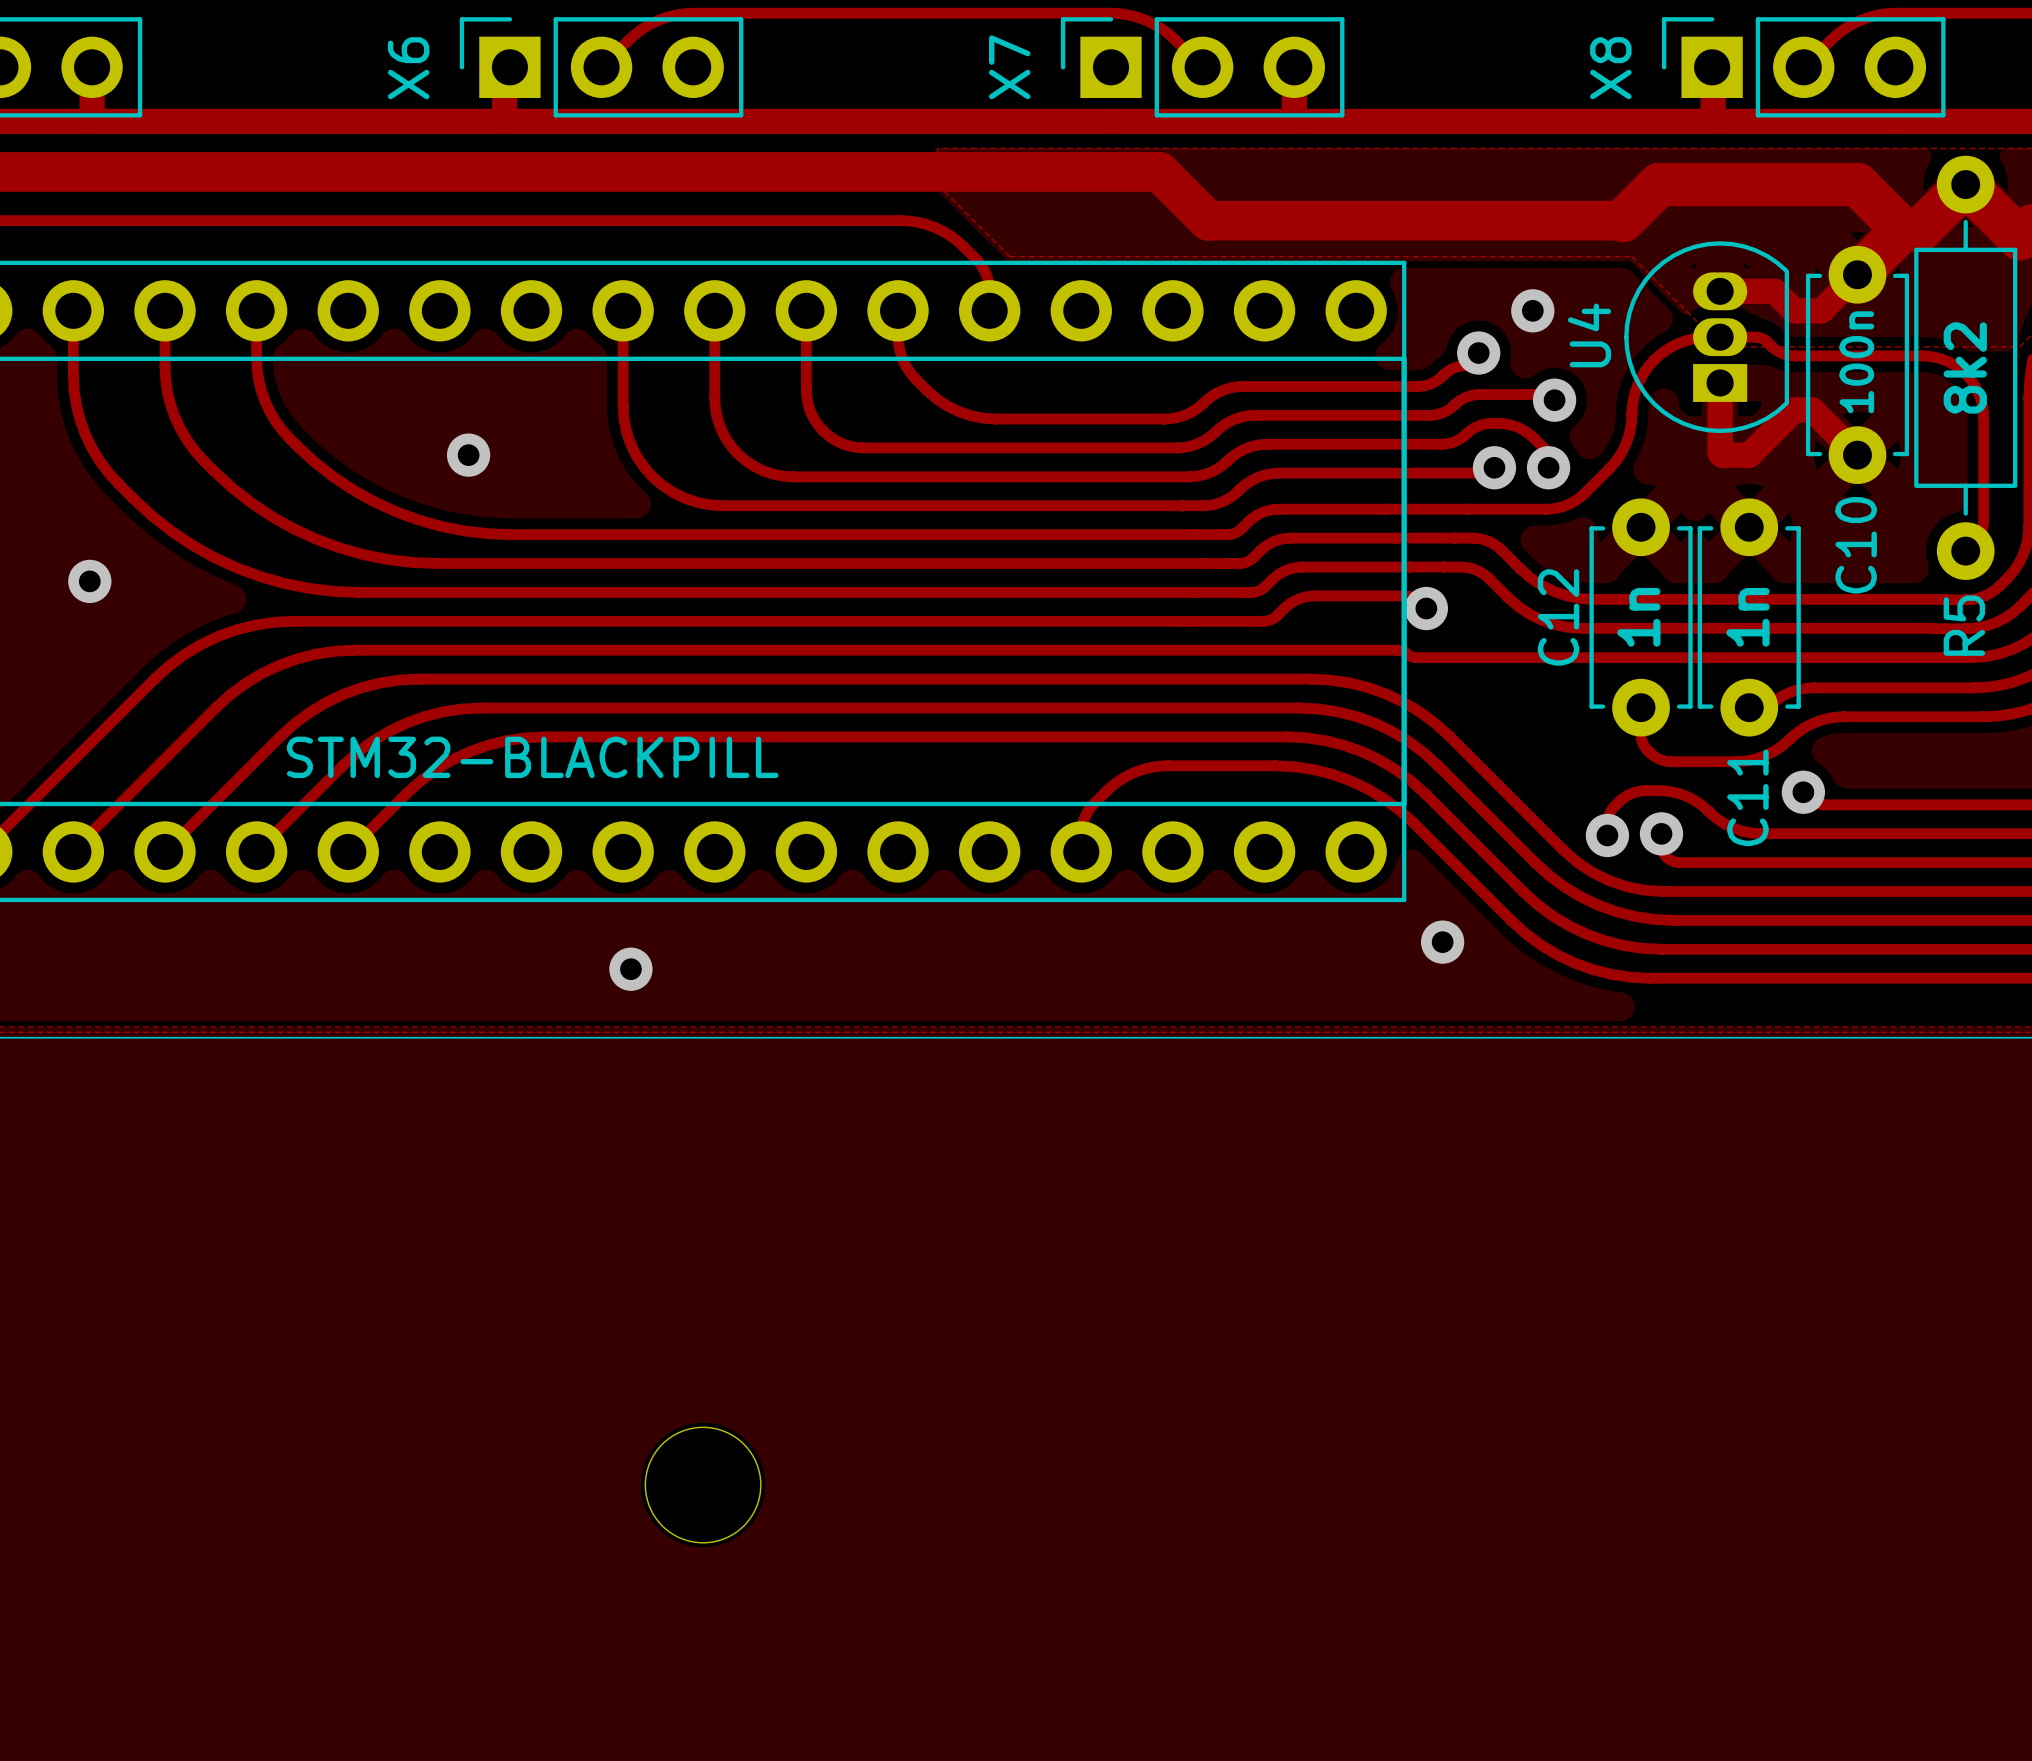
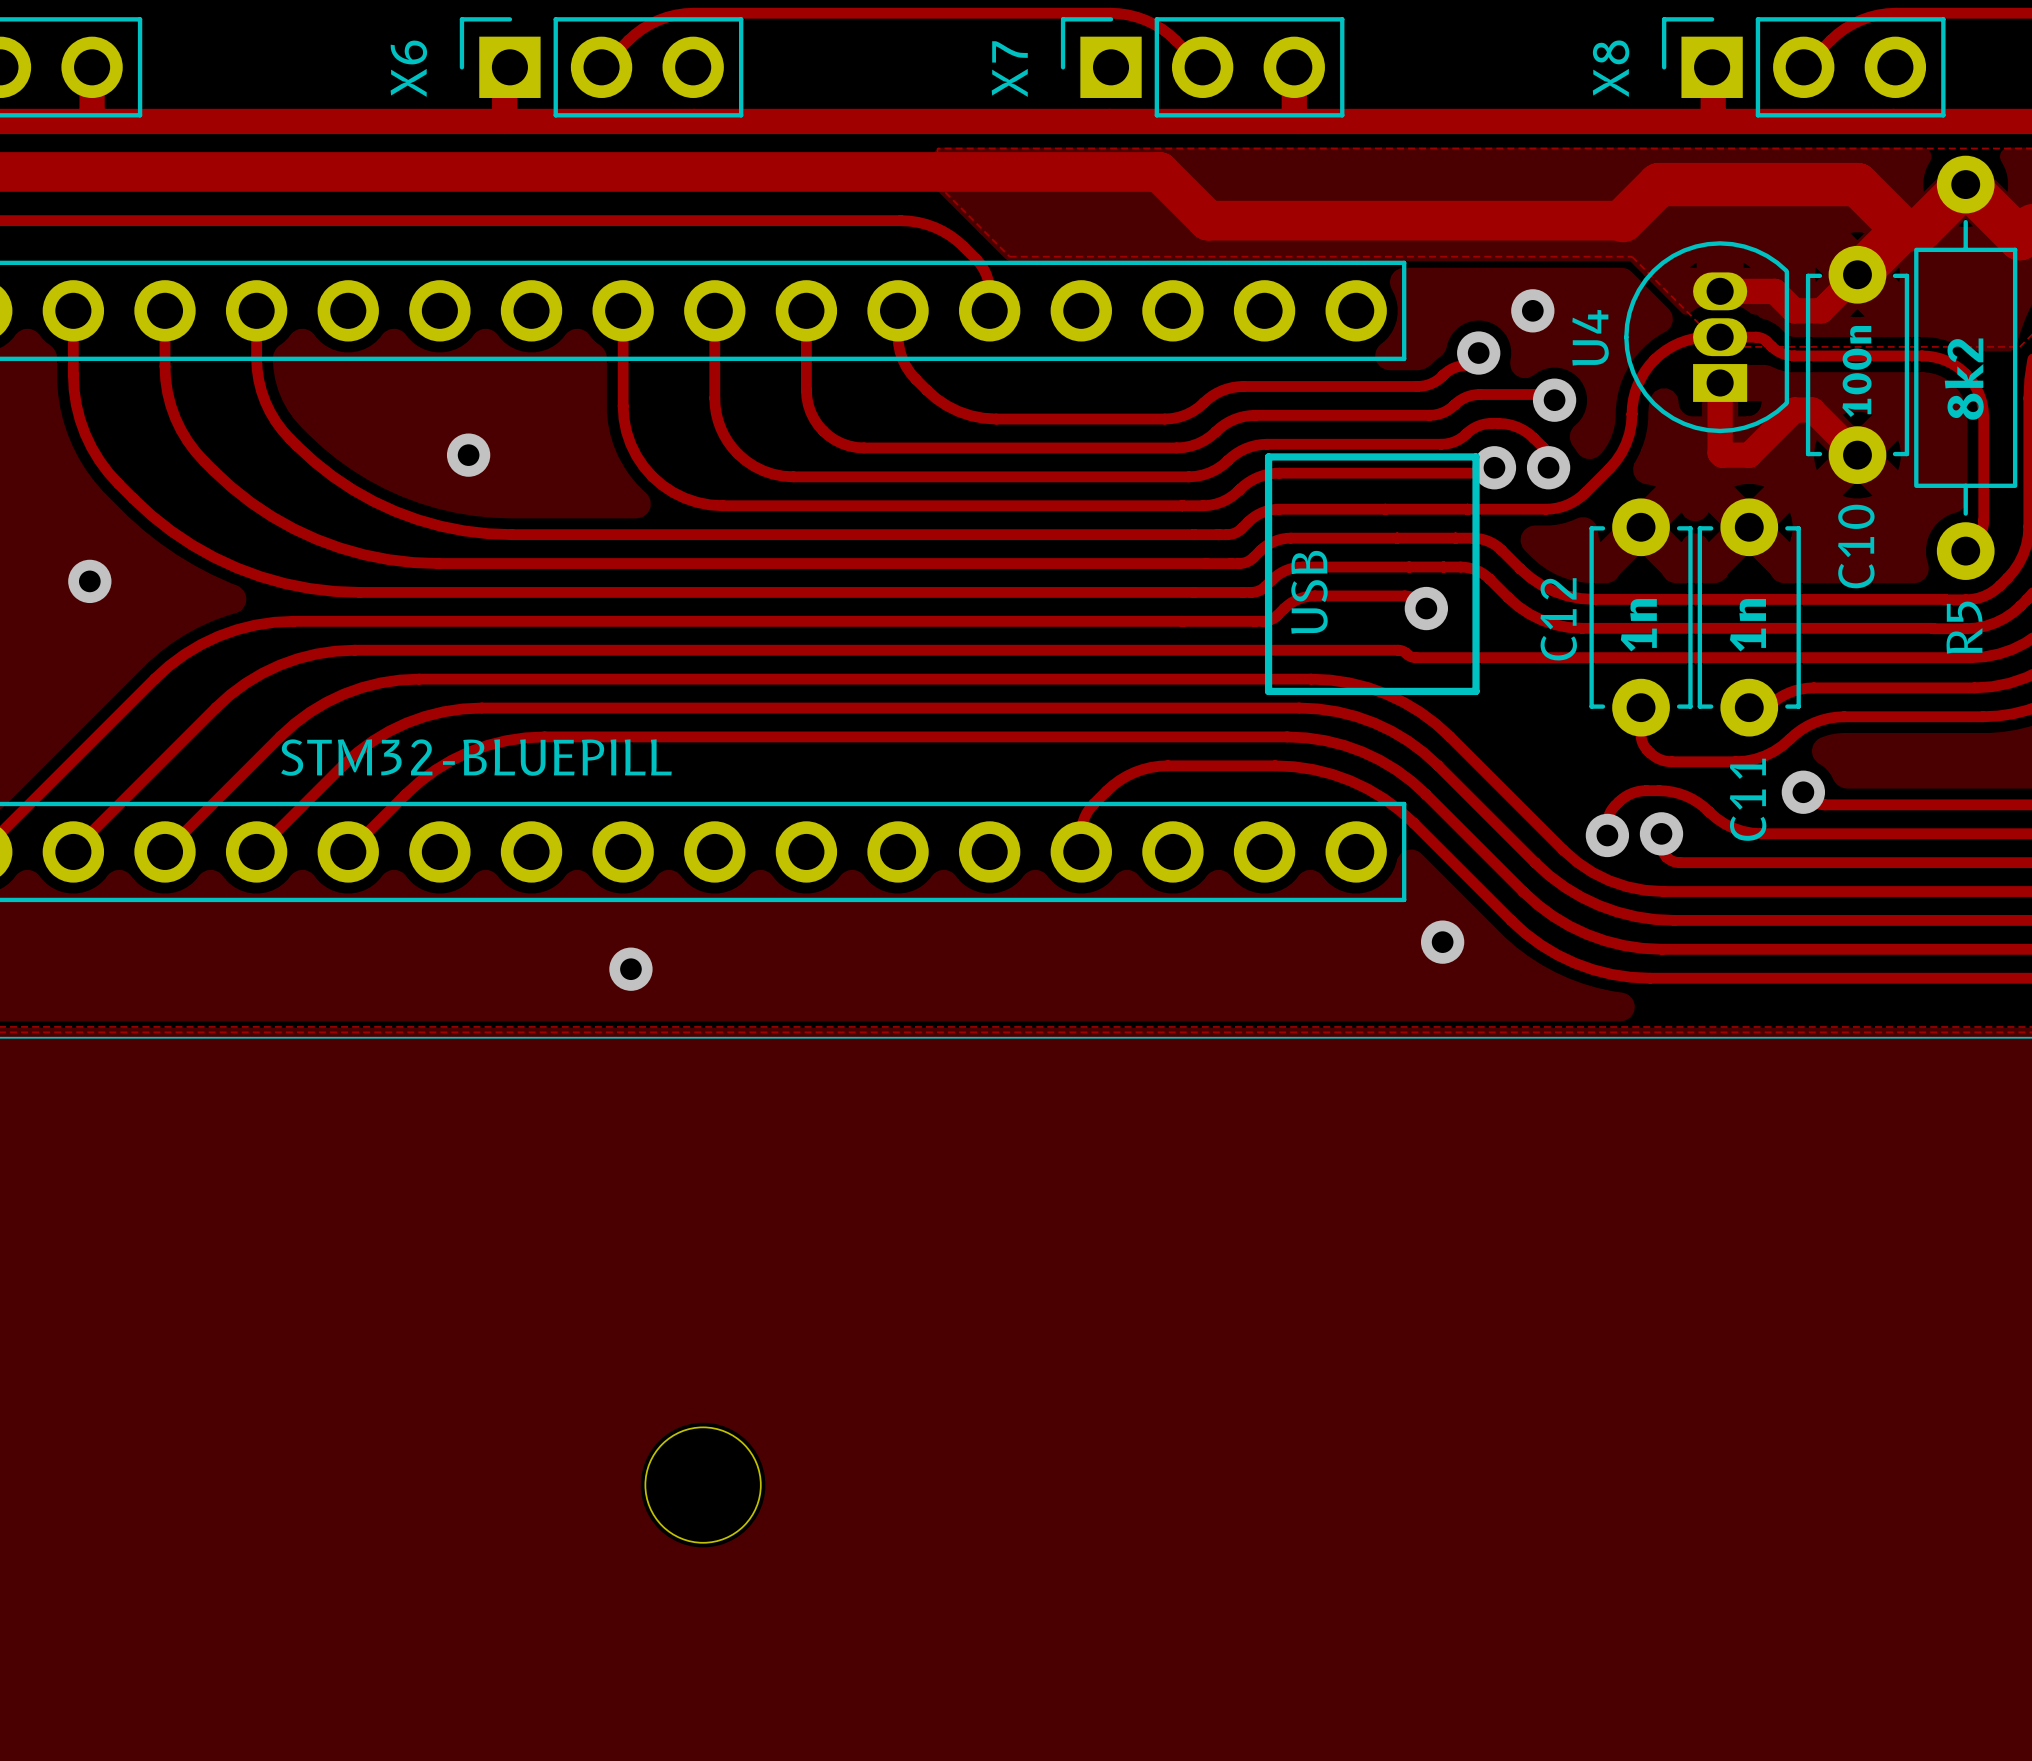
line: (1404, 358) (1404, 803) -> none
line: none -> (1268, 456) (1268, 691) (1476, 691) (1476, 456) (1268, 456)
text: none -> USB (1309, 592)
text: STM32-BLACKPILL (532, 757) -> STM32-BLUEPILL (476, 757)

